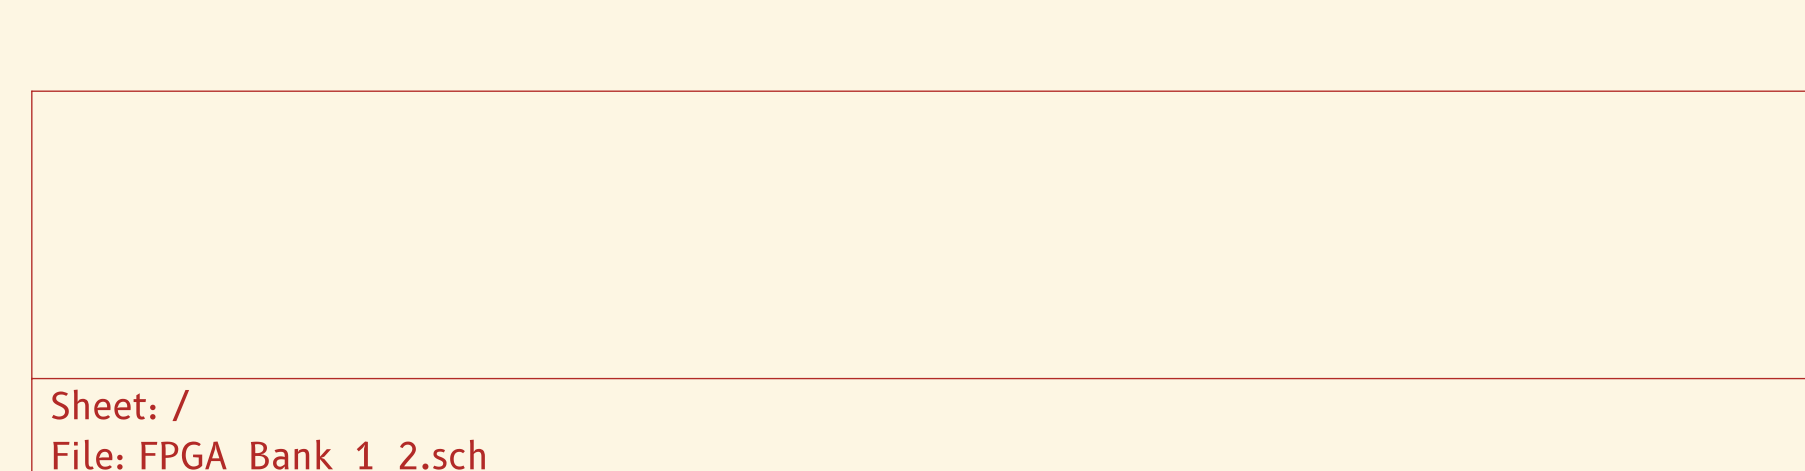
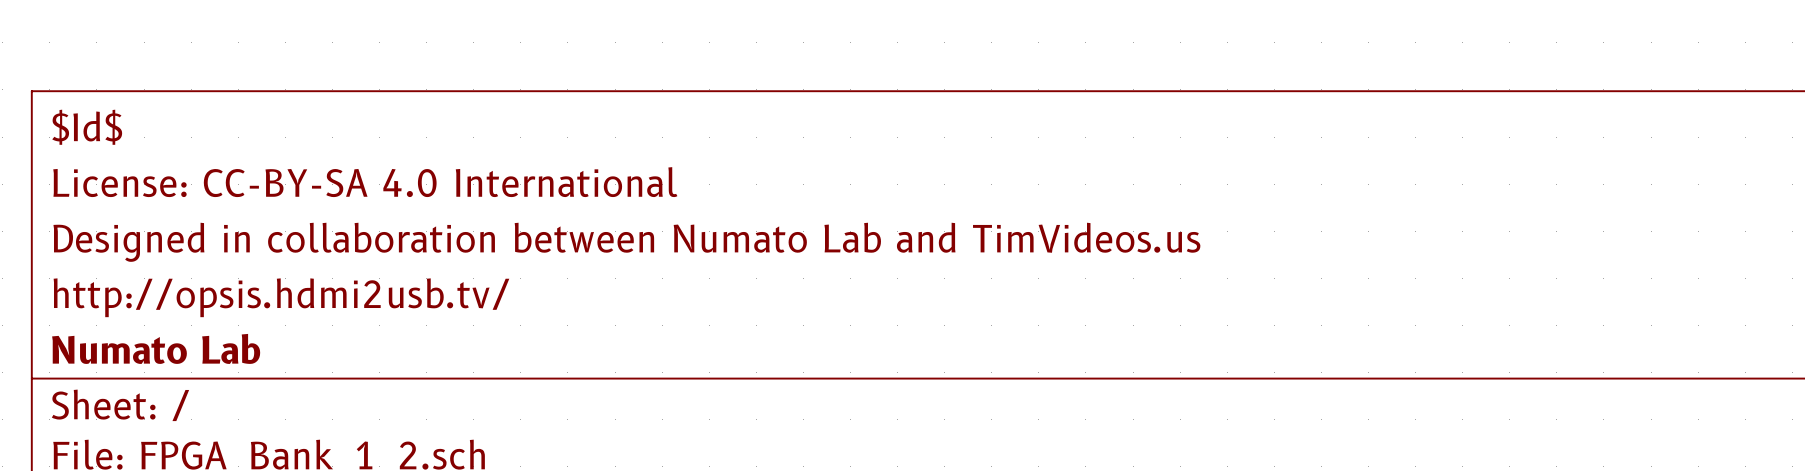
title block: none -> $Id$ (87, 127)
title block: none -> License: CC-BY-SA 4.0 International (365, 182)
title block: none -> Designed in collaboration between Numato Lab and TimVideos.us (626, 242)
title block: none -> http://opsis.hdmi2usb.tv/ (281, 297)
title block: none -> Numato Lab (156, 348)

